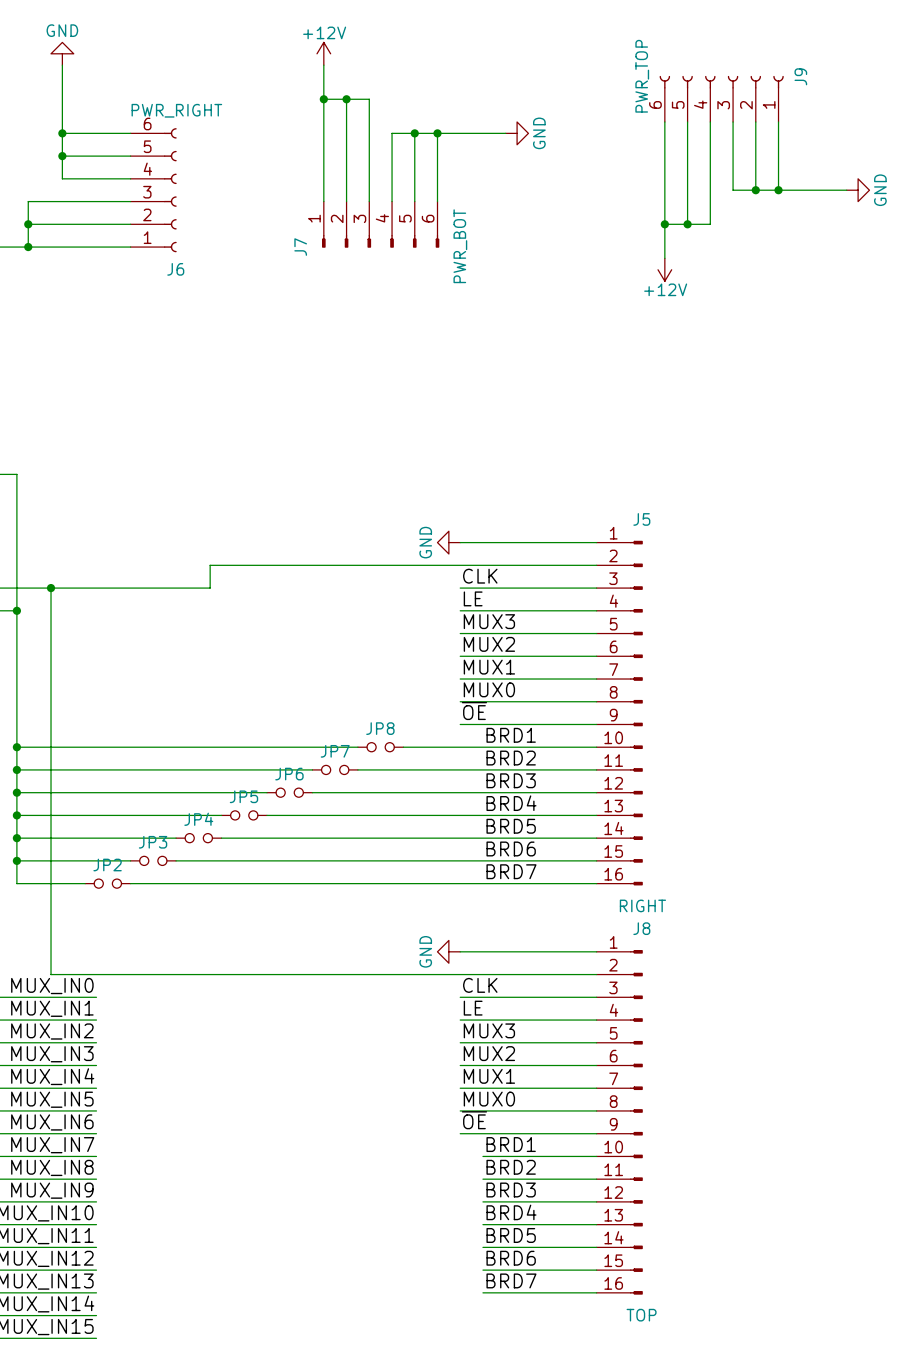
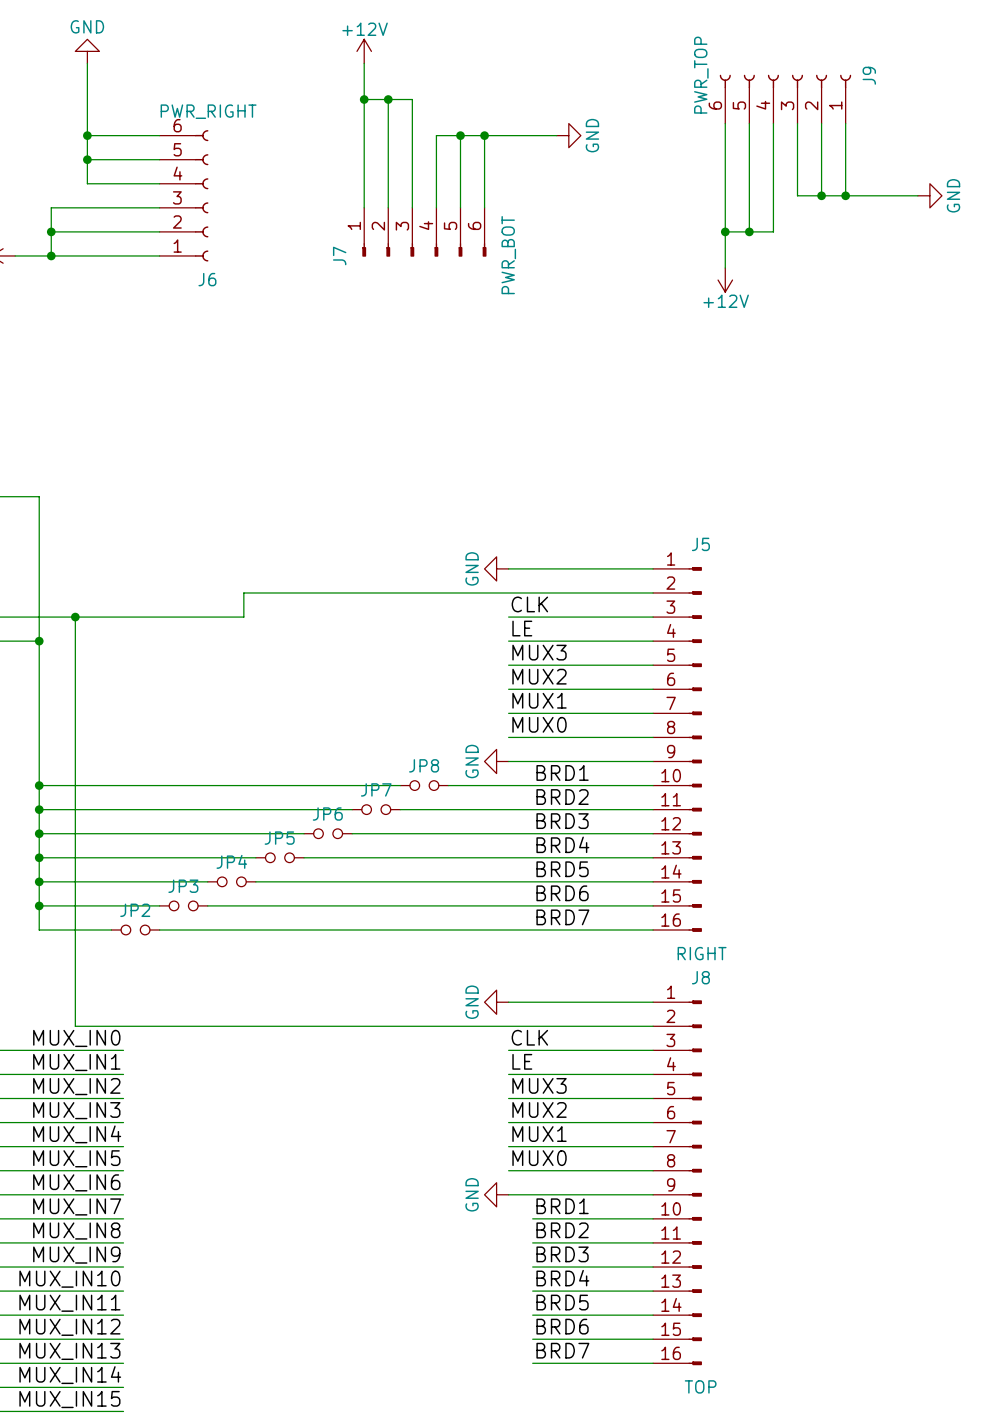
label: ~{OE} (474, 711) -> none
power symbol: none -> GND (496, 761)
label: ~{OE} (474, 1120) -> none
power symbol: none -> GND (496, 1194)

